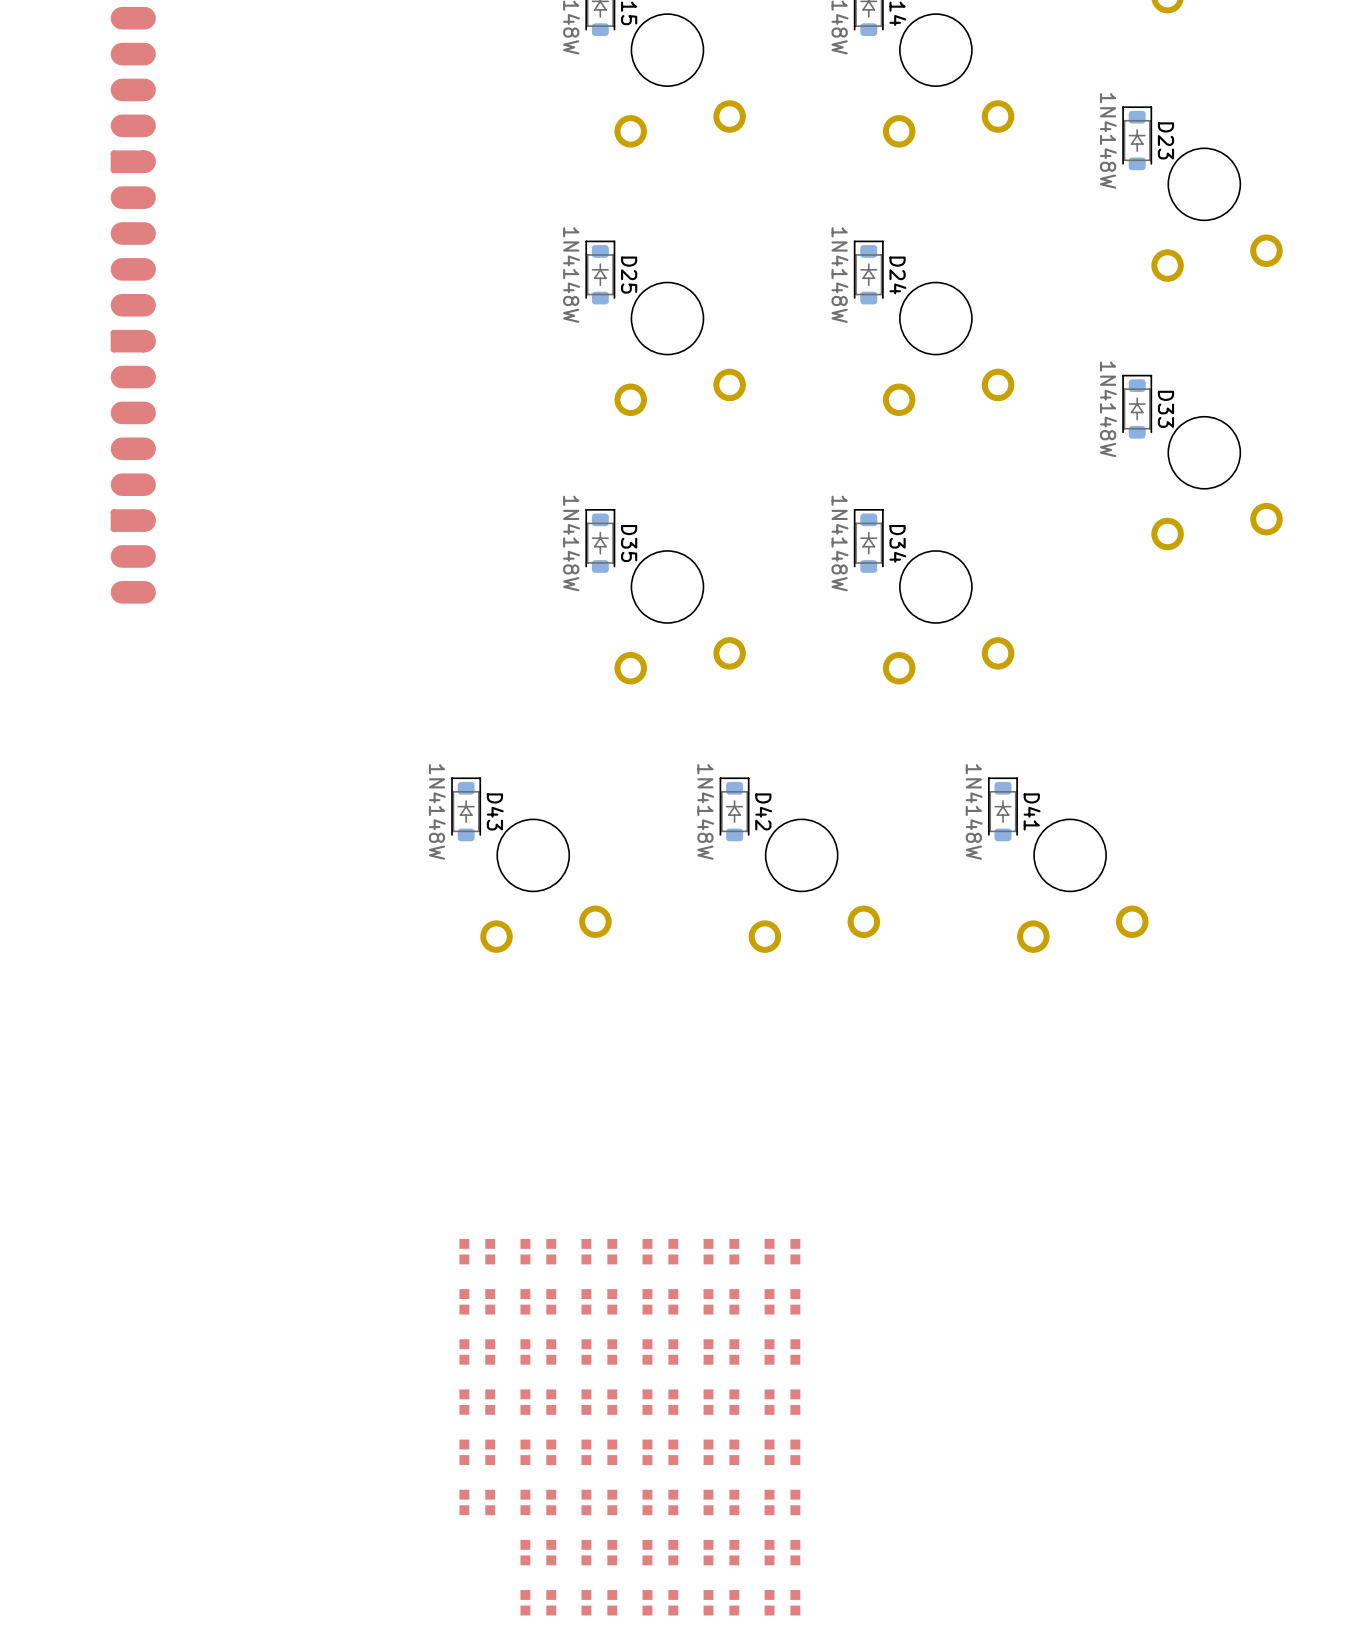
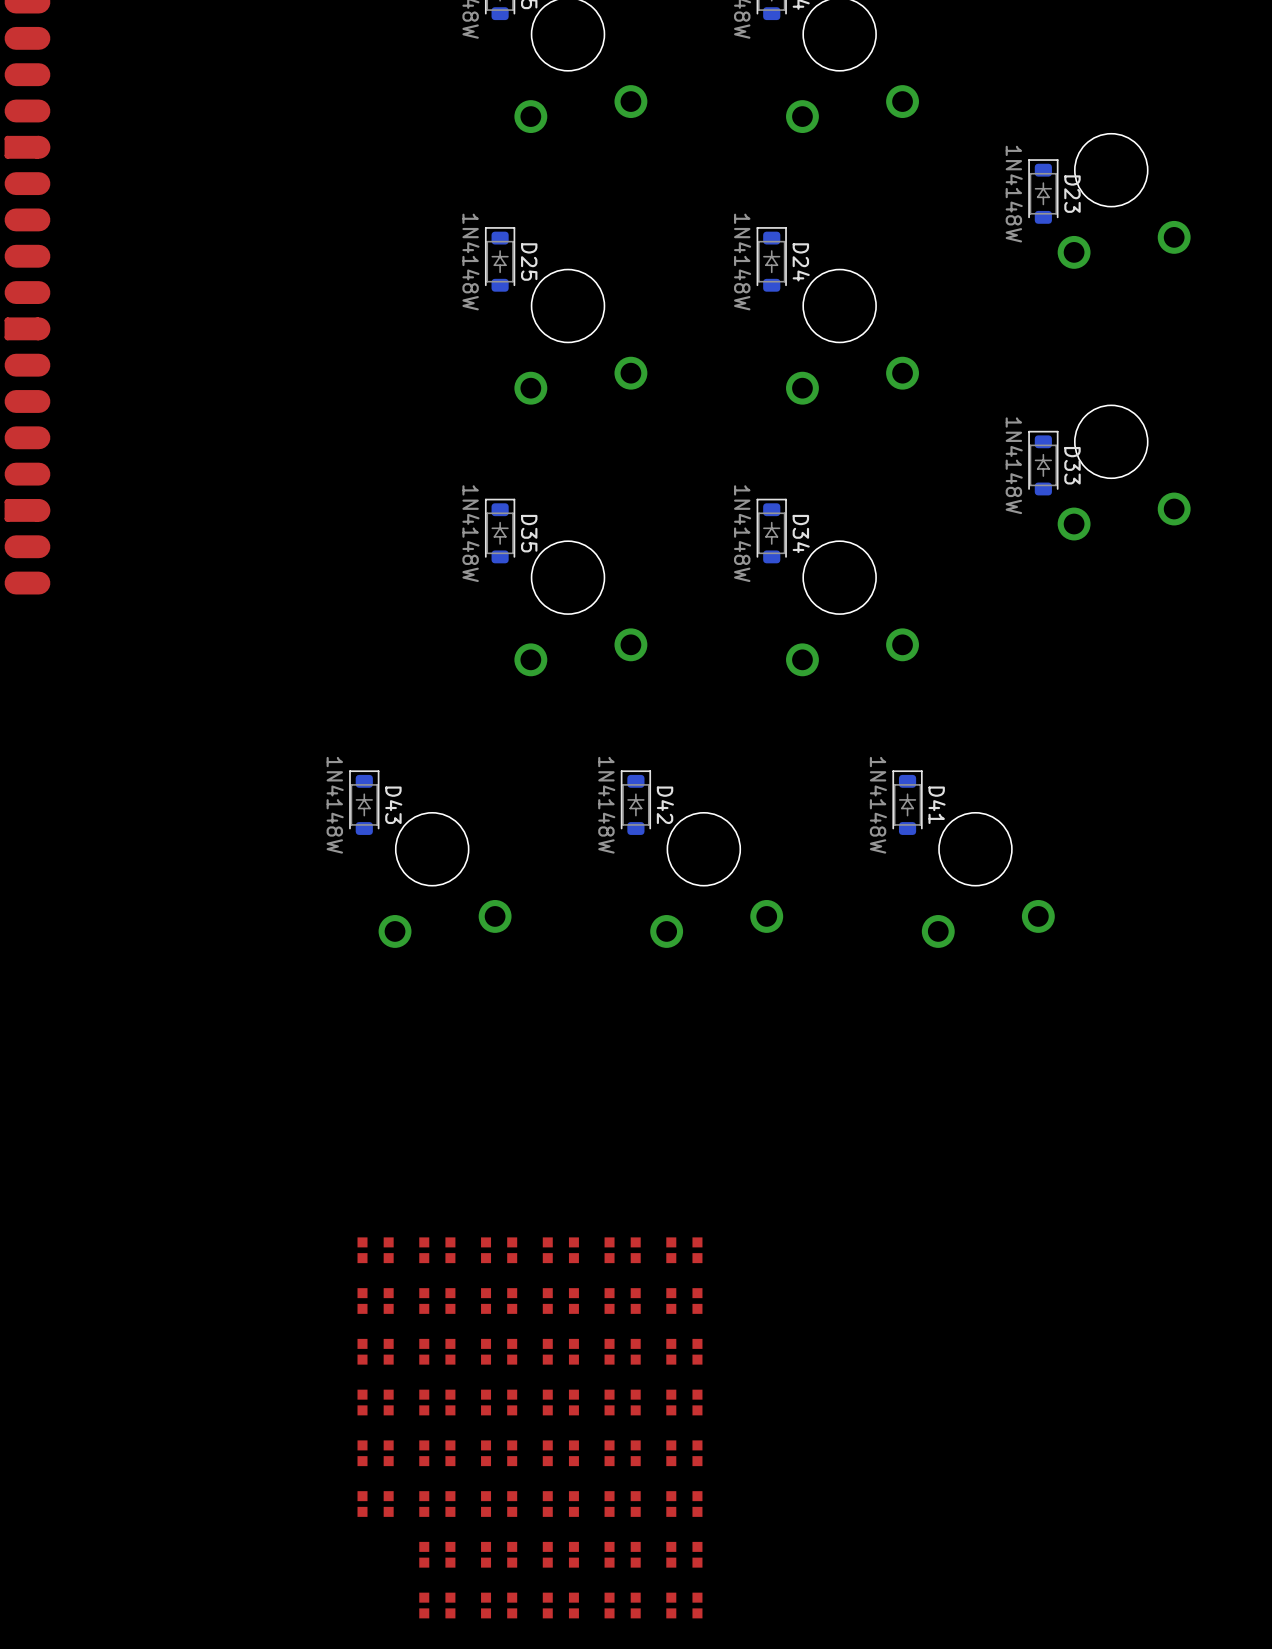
D23 position: (1137, 138) -> (1043, 191)
D33 position: (1137, 406) -> (1043, 463)

